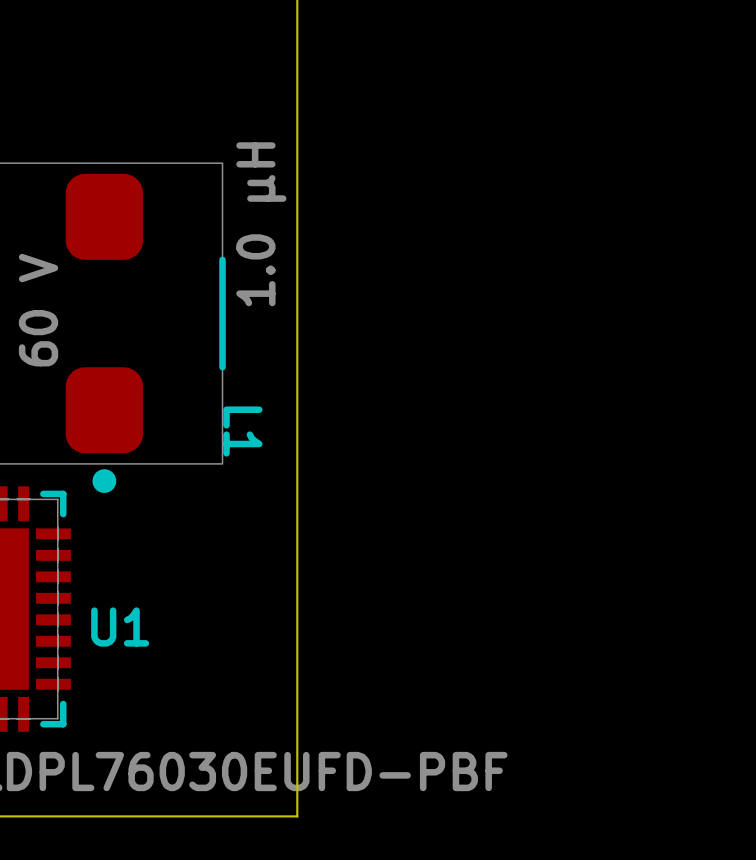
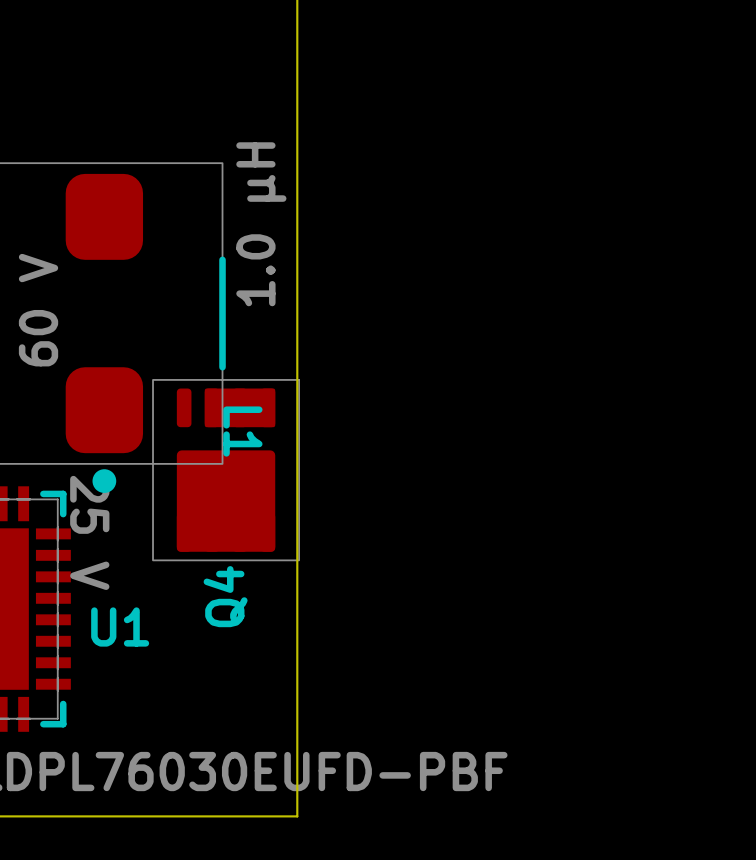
Q4: none -> 25 V (226, 470)

